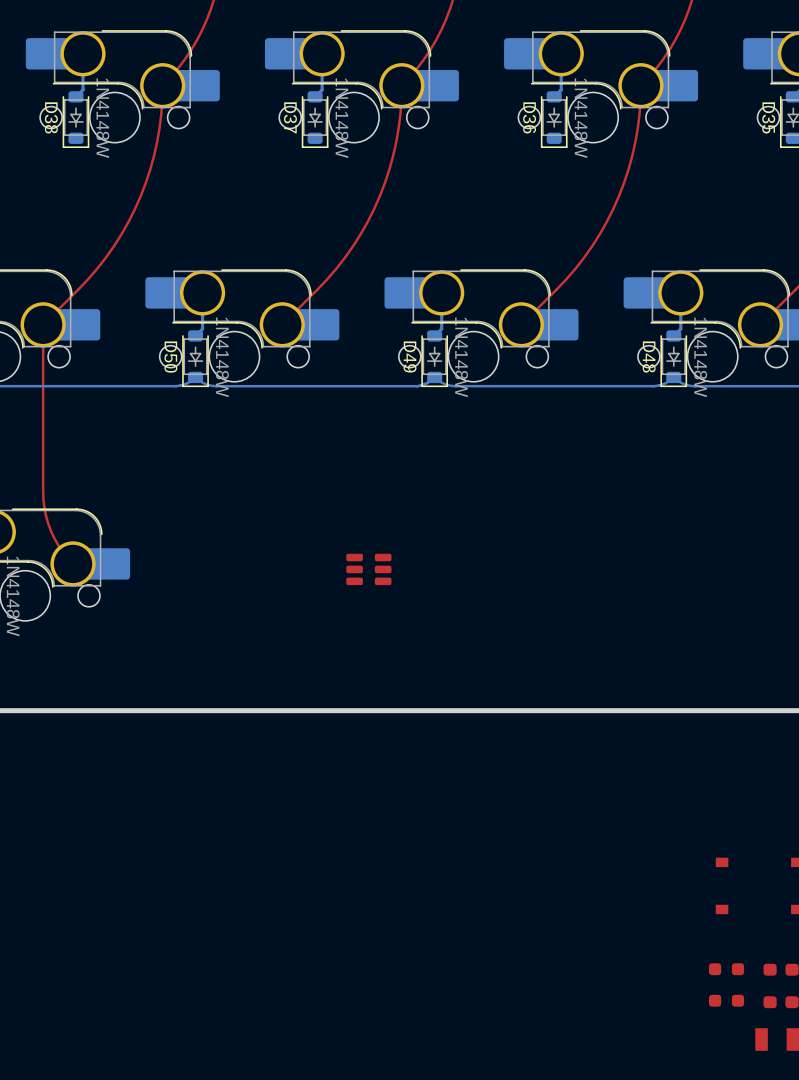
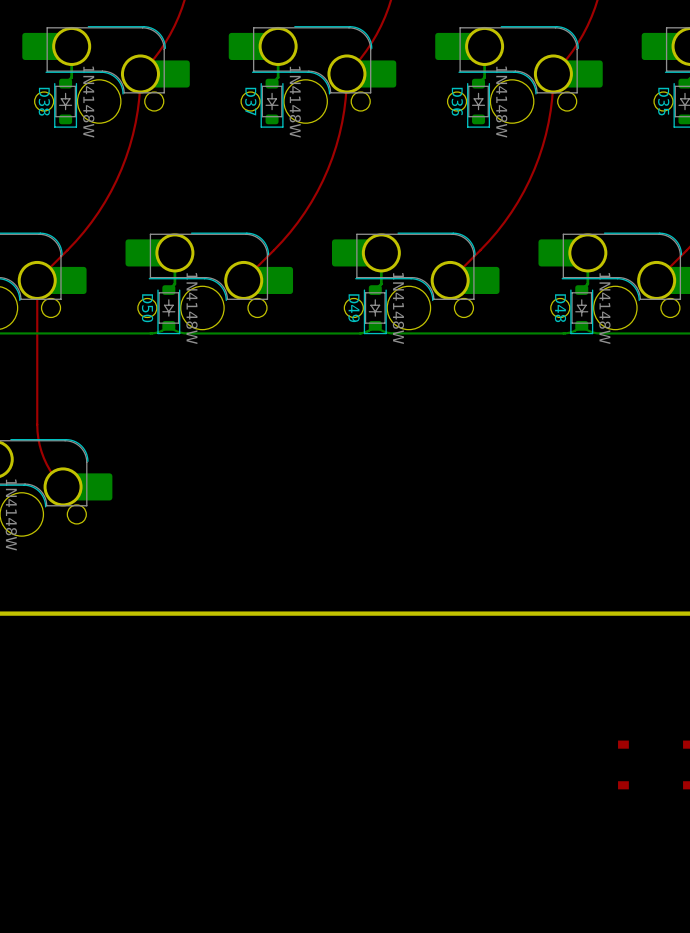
part: (368, 569) -> none
part: (726, 969) -> none
part: (781, 969) -> none
part: (726, 1000) -> none
part: (781, 1002) -> none
part: (777, 1039) -> none

